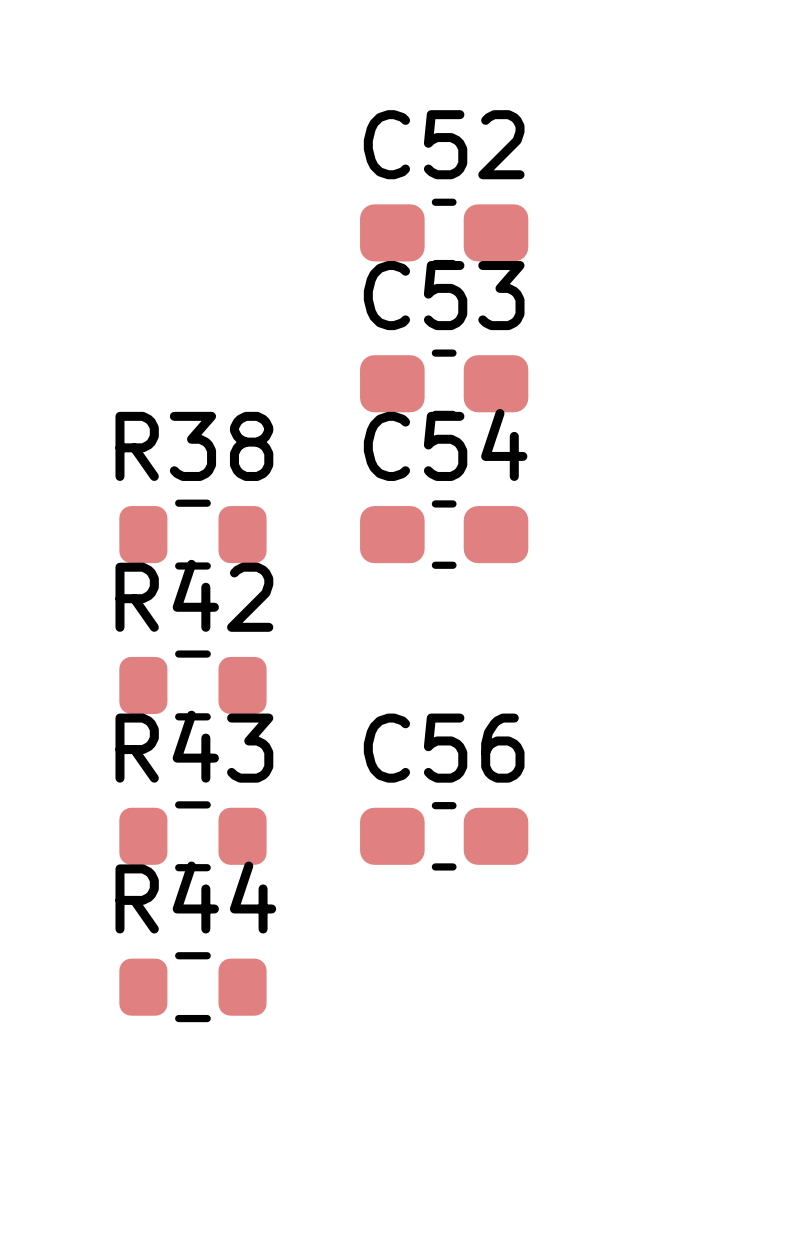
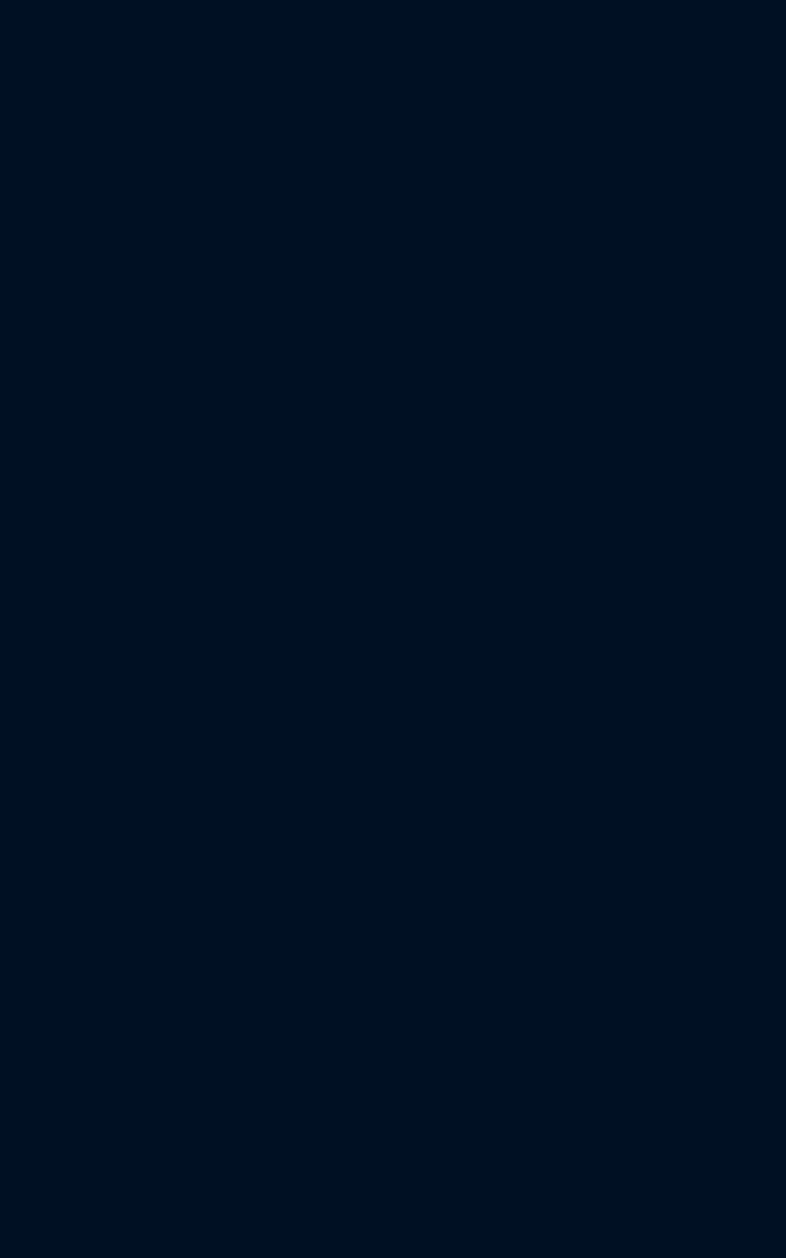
C52: (444, 232) -> none
C53: (444, 383) -> none
R38: (192, 534) -> none
C54: (444, 534) -> none
R42: (192, 685) -> none
R43: (192, 836) -> none
C56: (444, 836) -> none
R44: (192, 987) -> none

